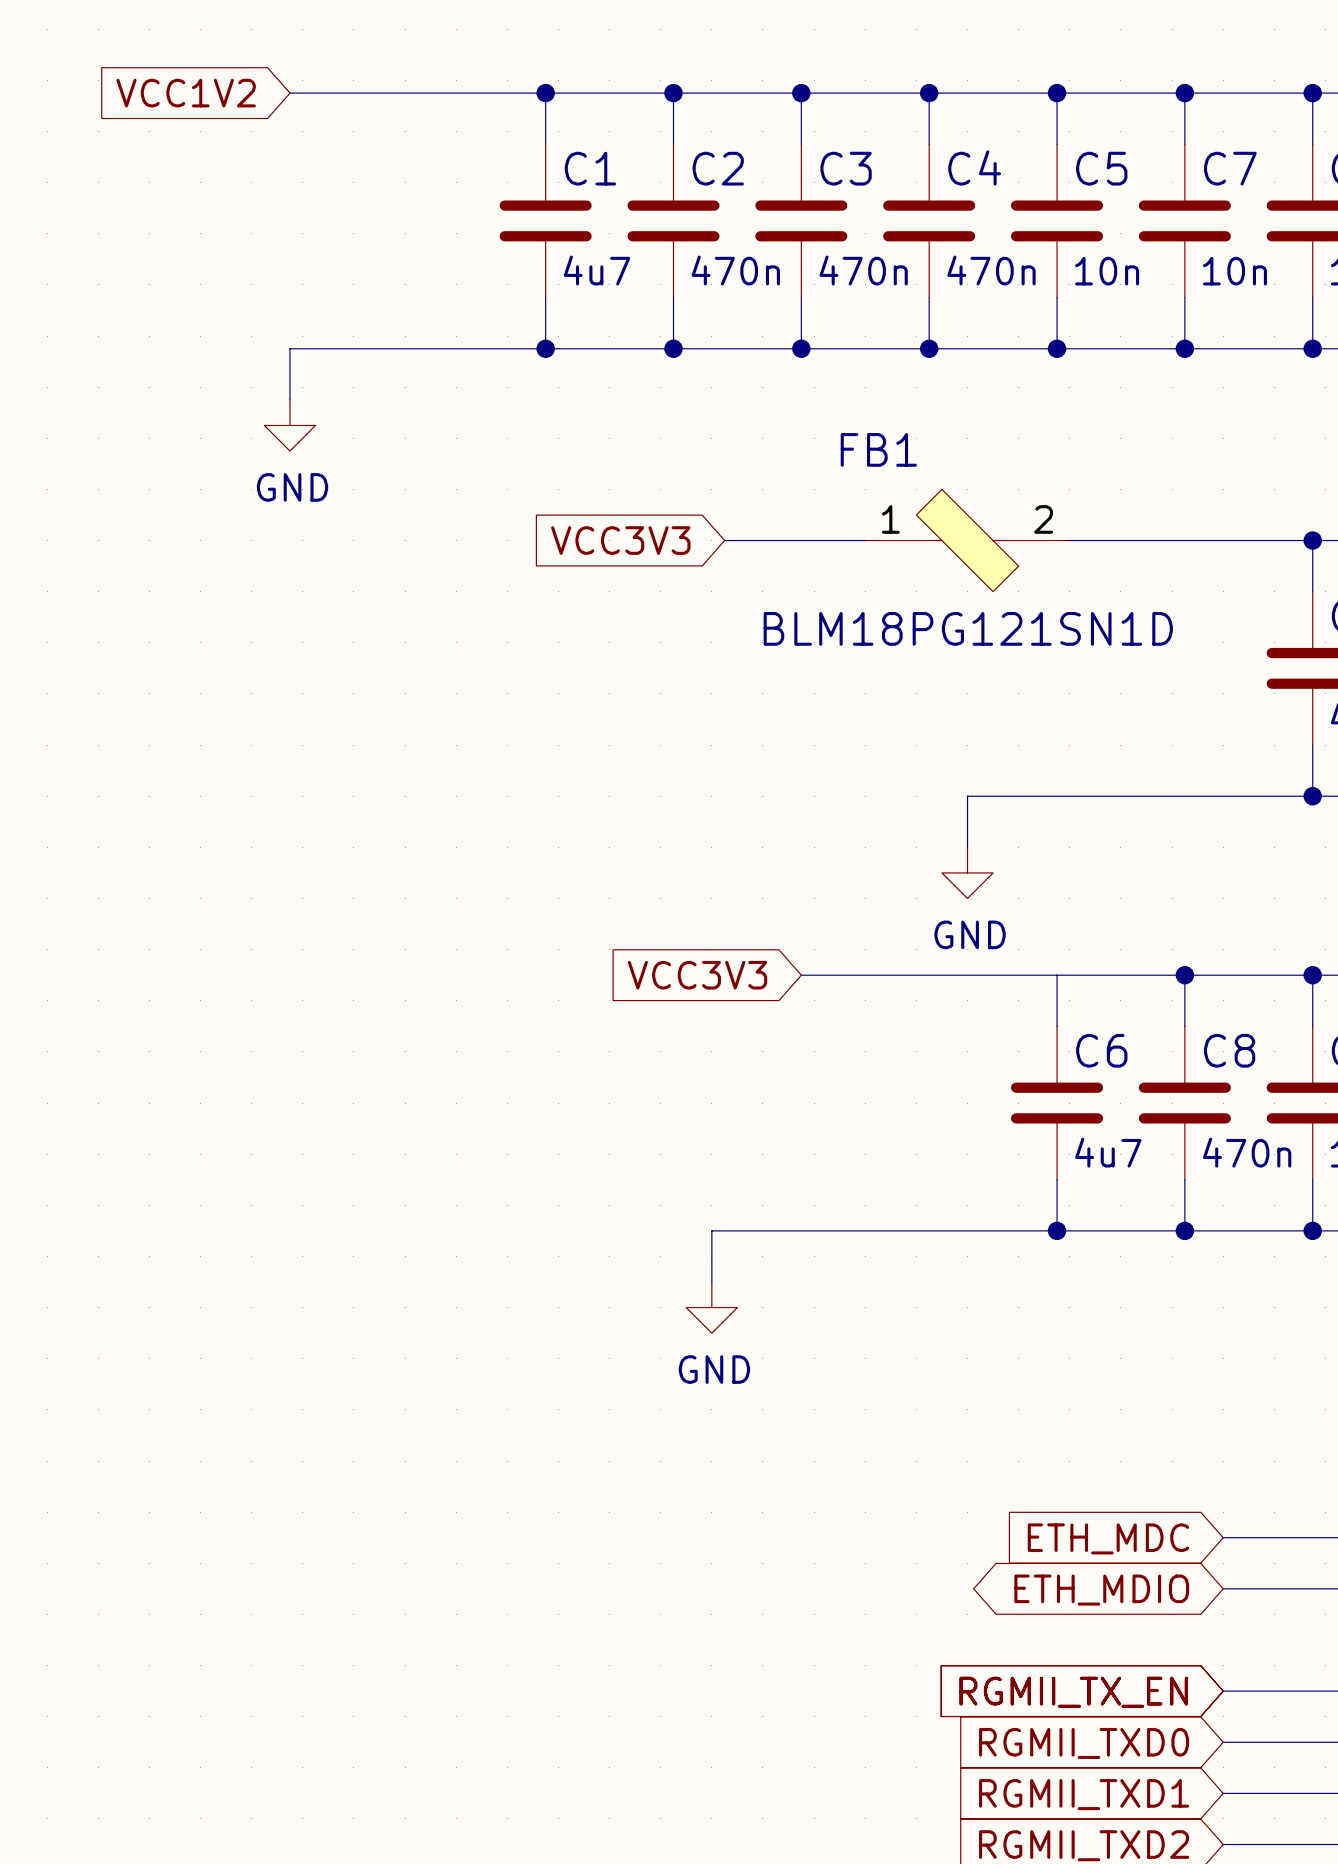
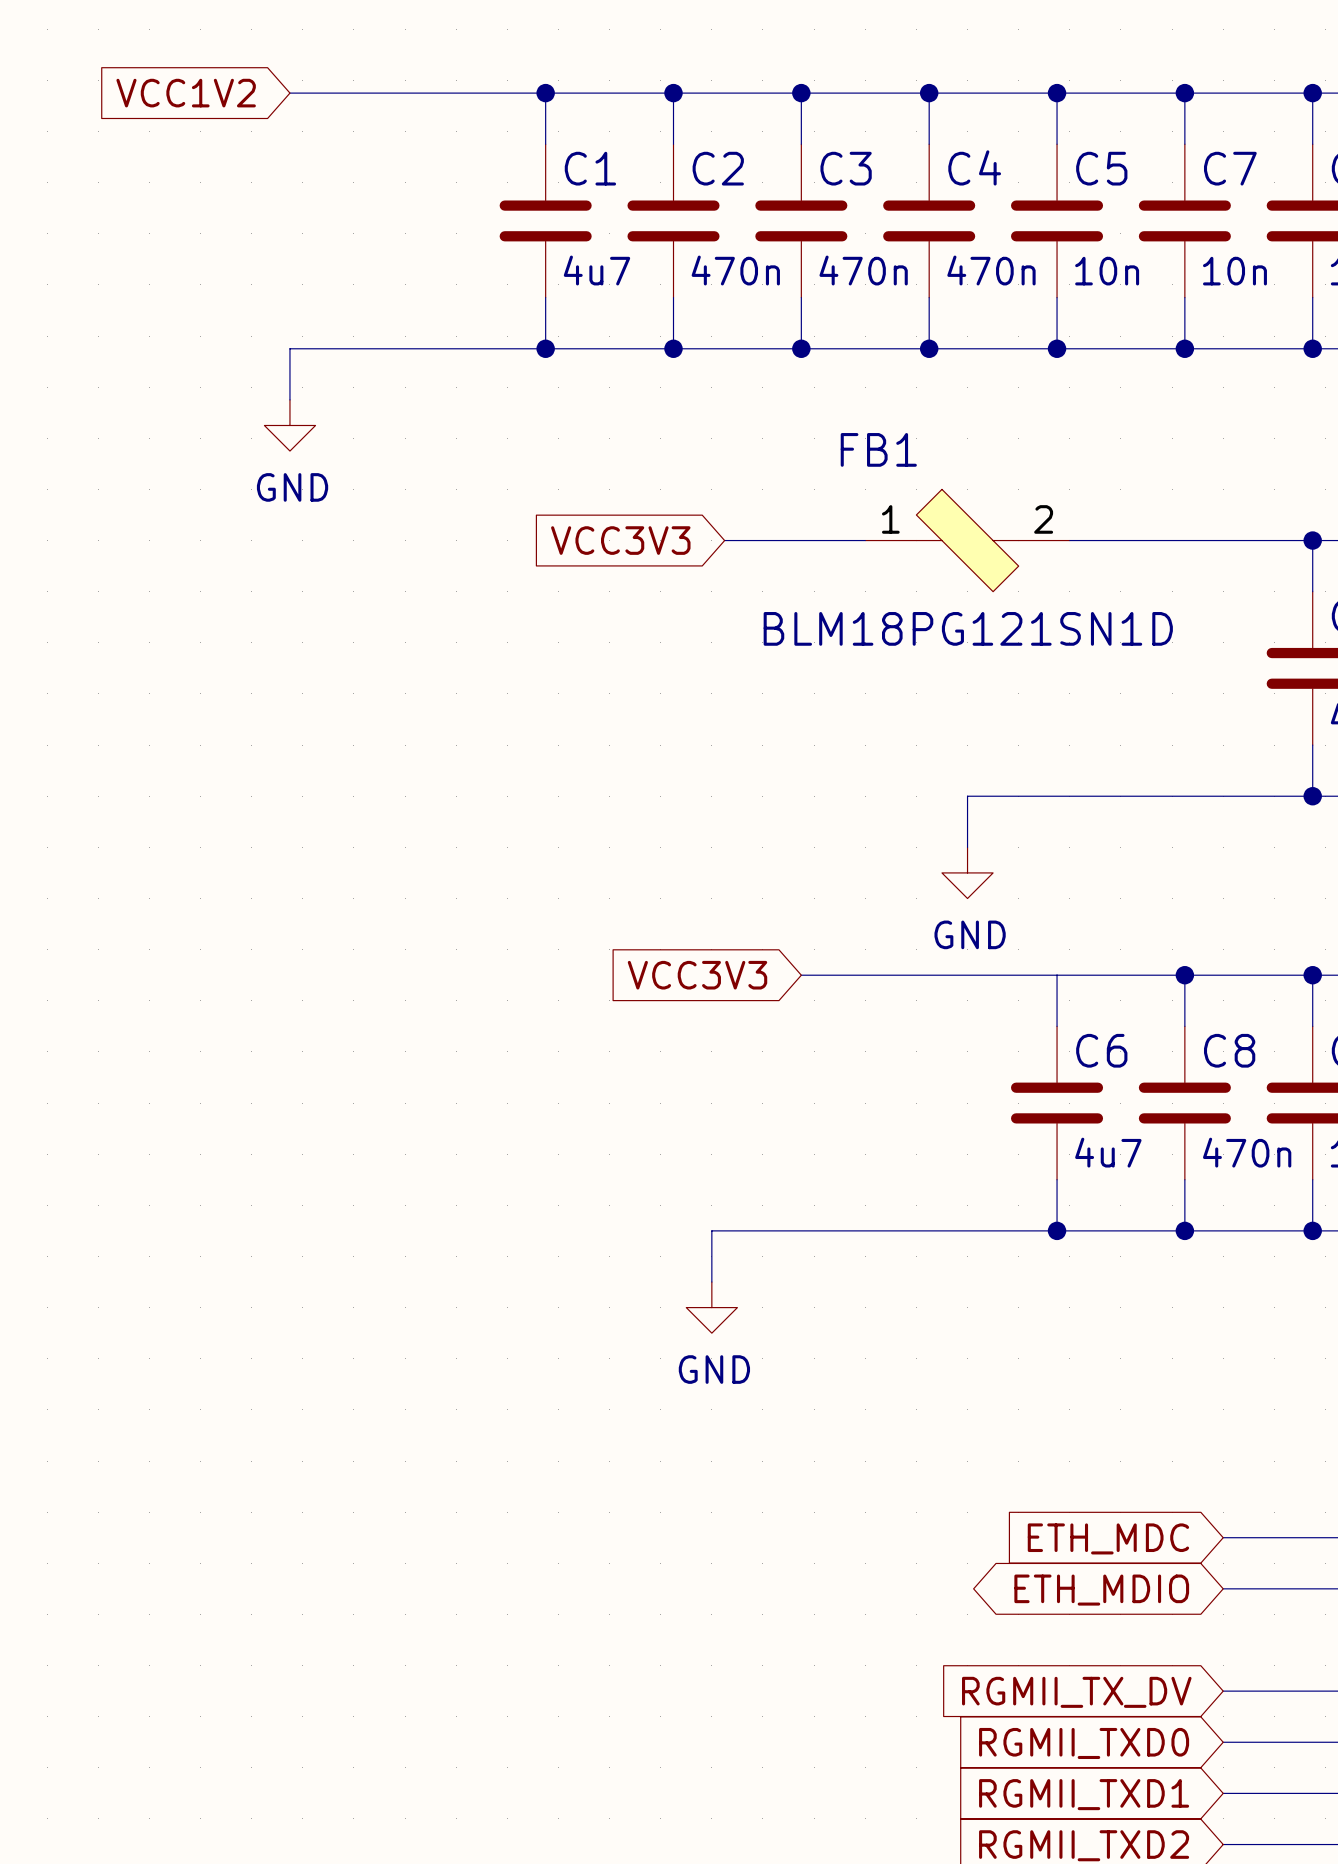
global label: RGMII_TX_EN (1073, 1692) -> RGMII_TX_DV (1076, 1692)

